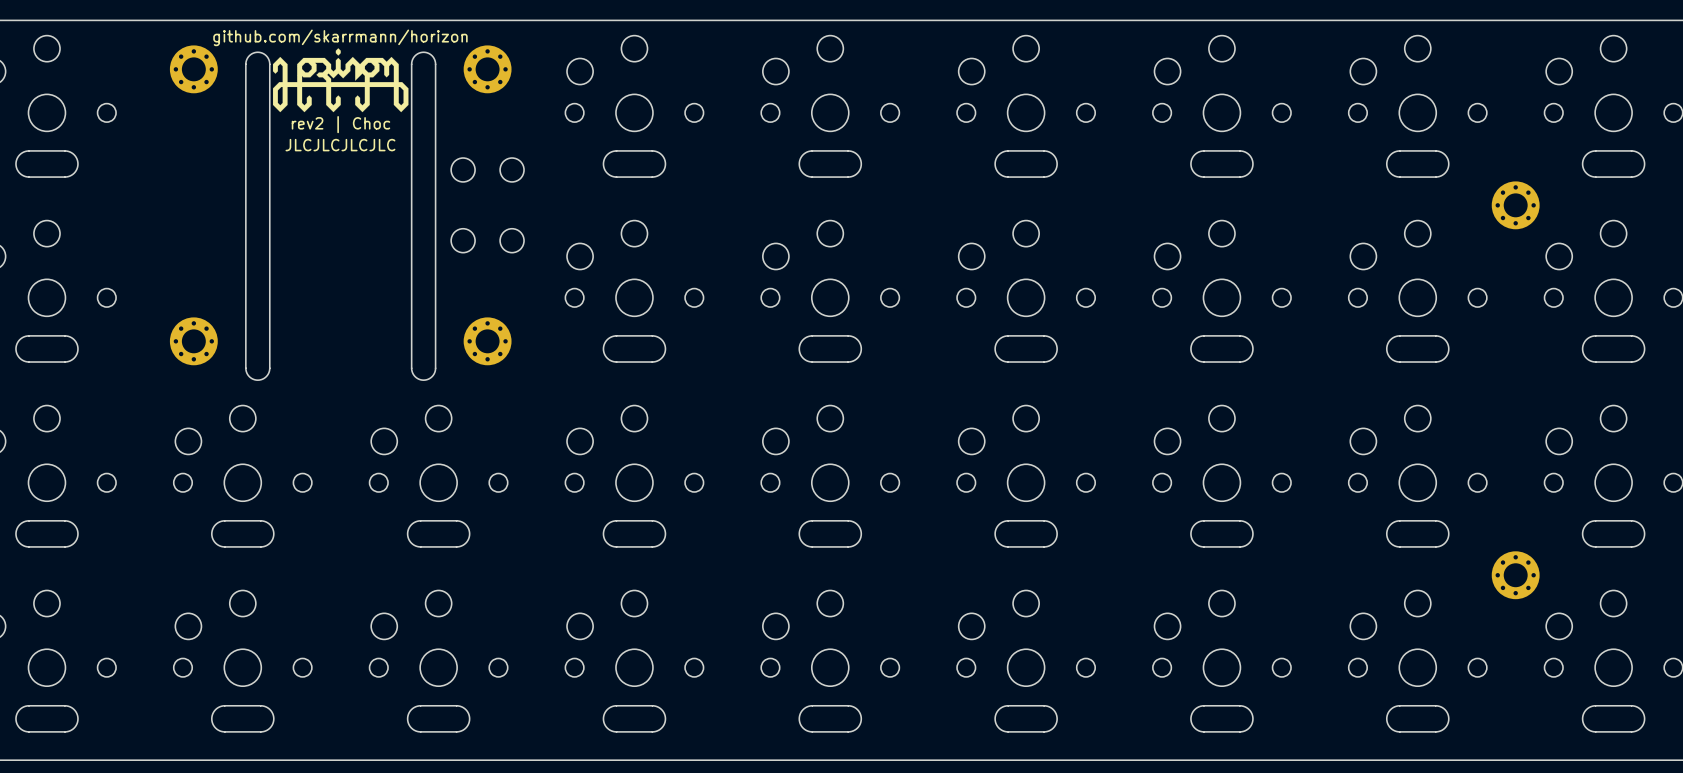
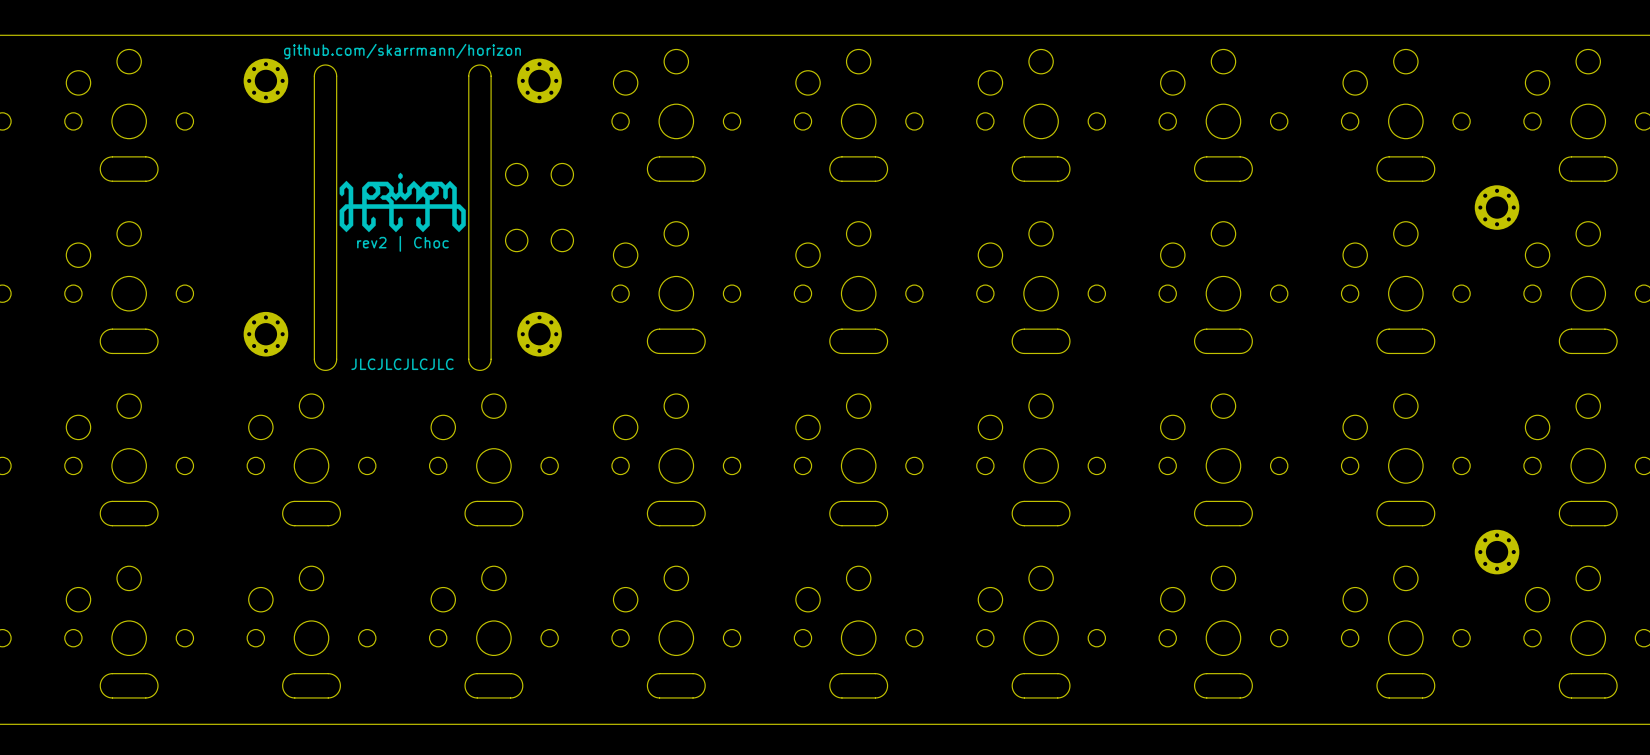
drawing position: (340, 80) -> (402, 202)
text position: rev2 | Choc (340, 124) -> rev2 | Choc (402, 243)
text position: JLCJLCJLCJLC (340, 145) -> JLCJLCJLCJLC (402, 364)

